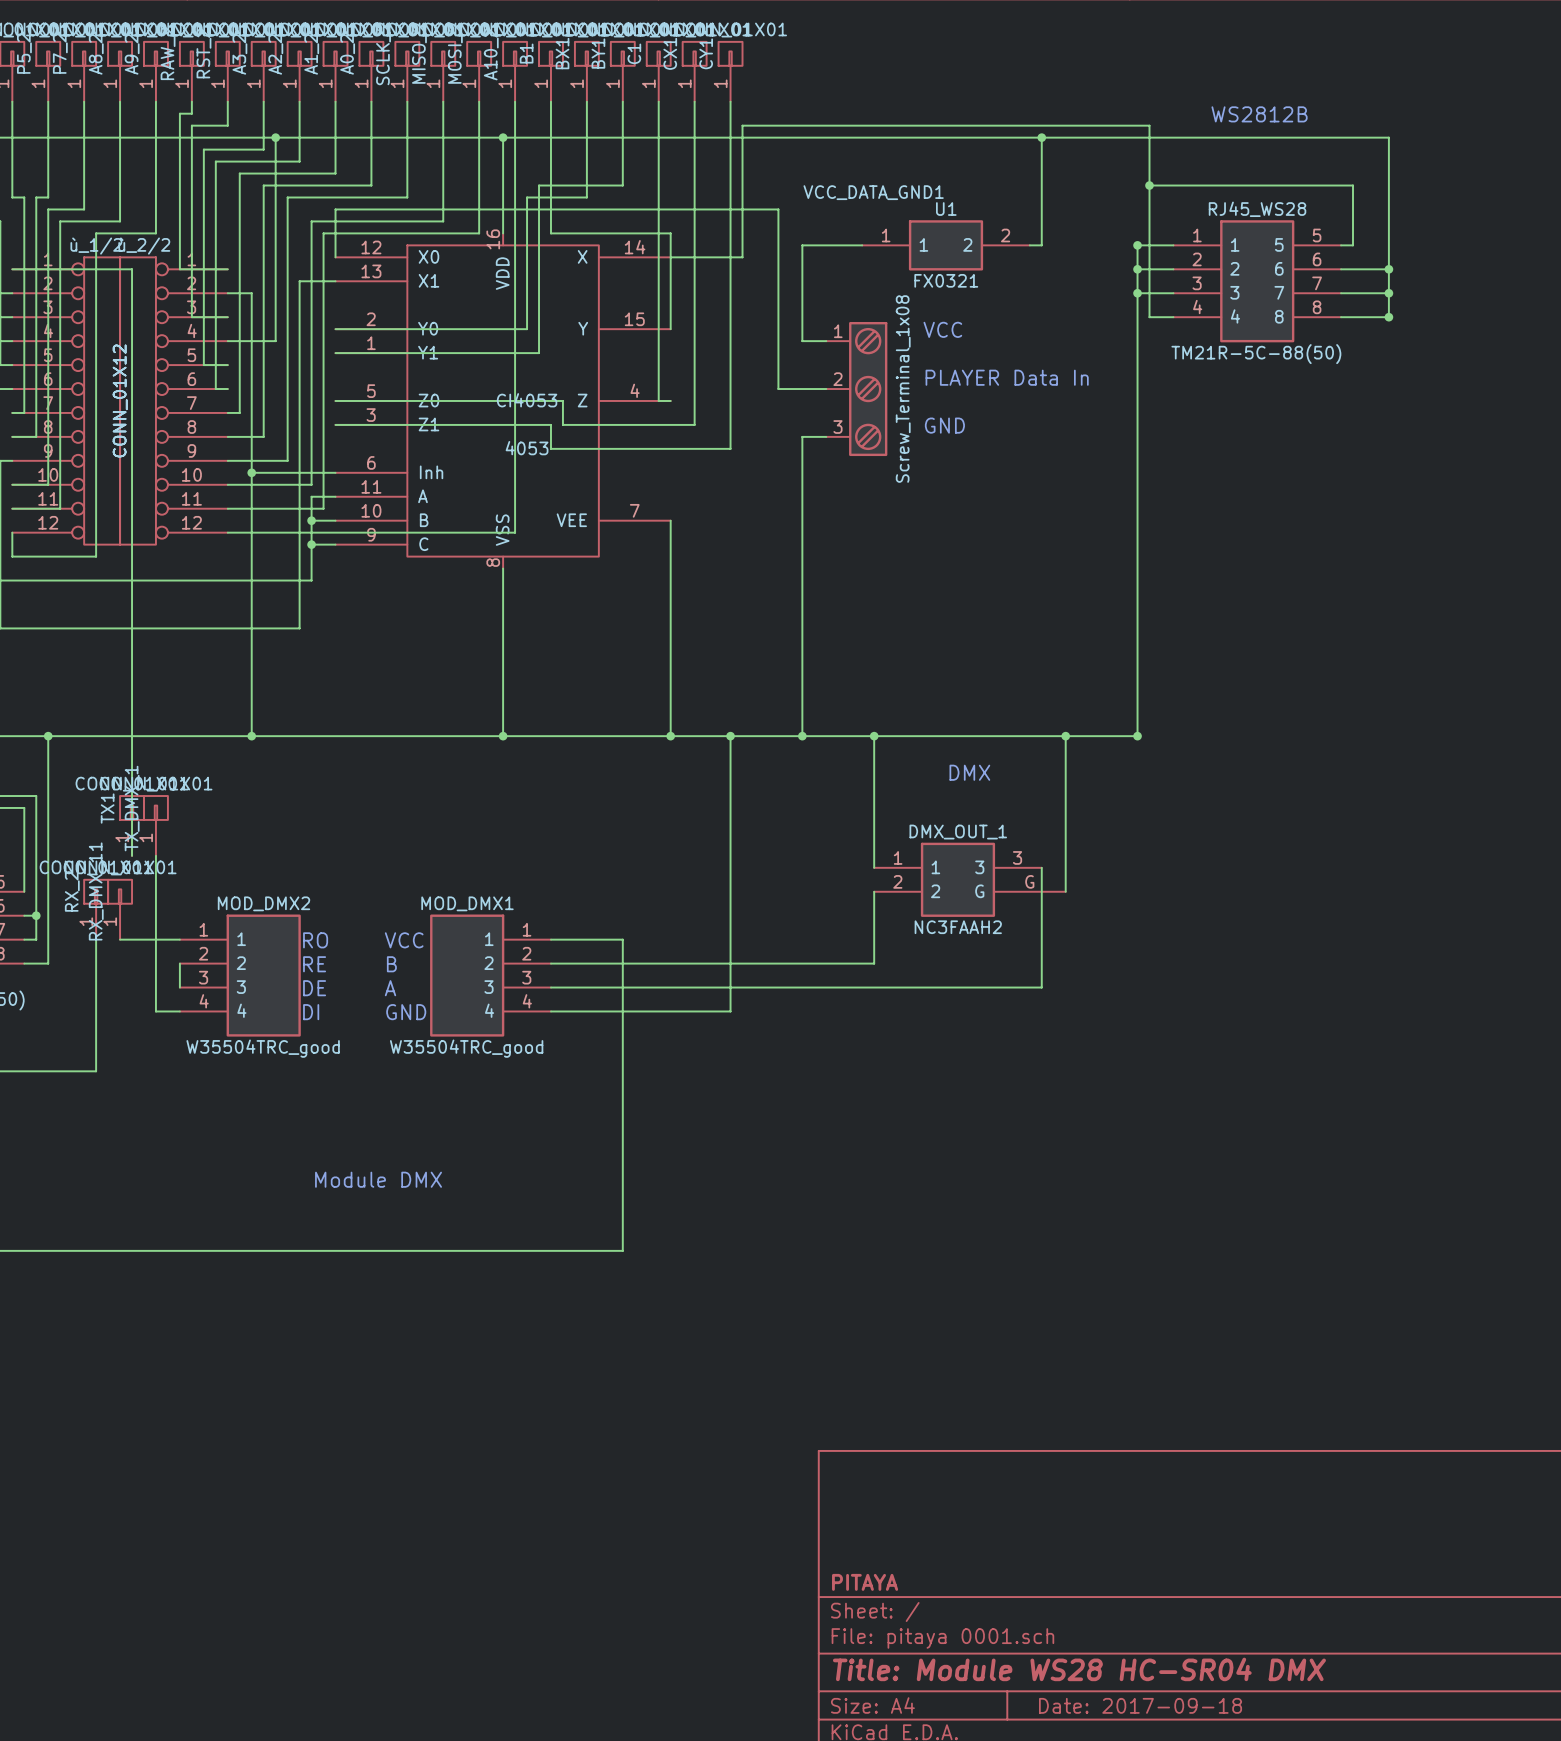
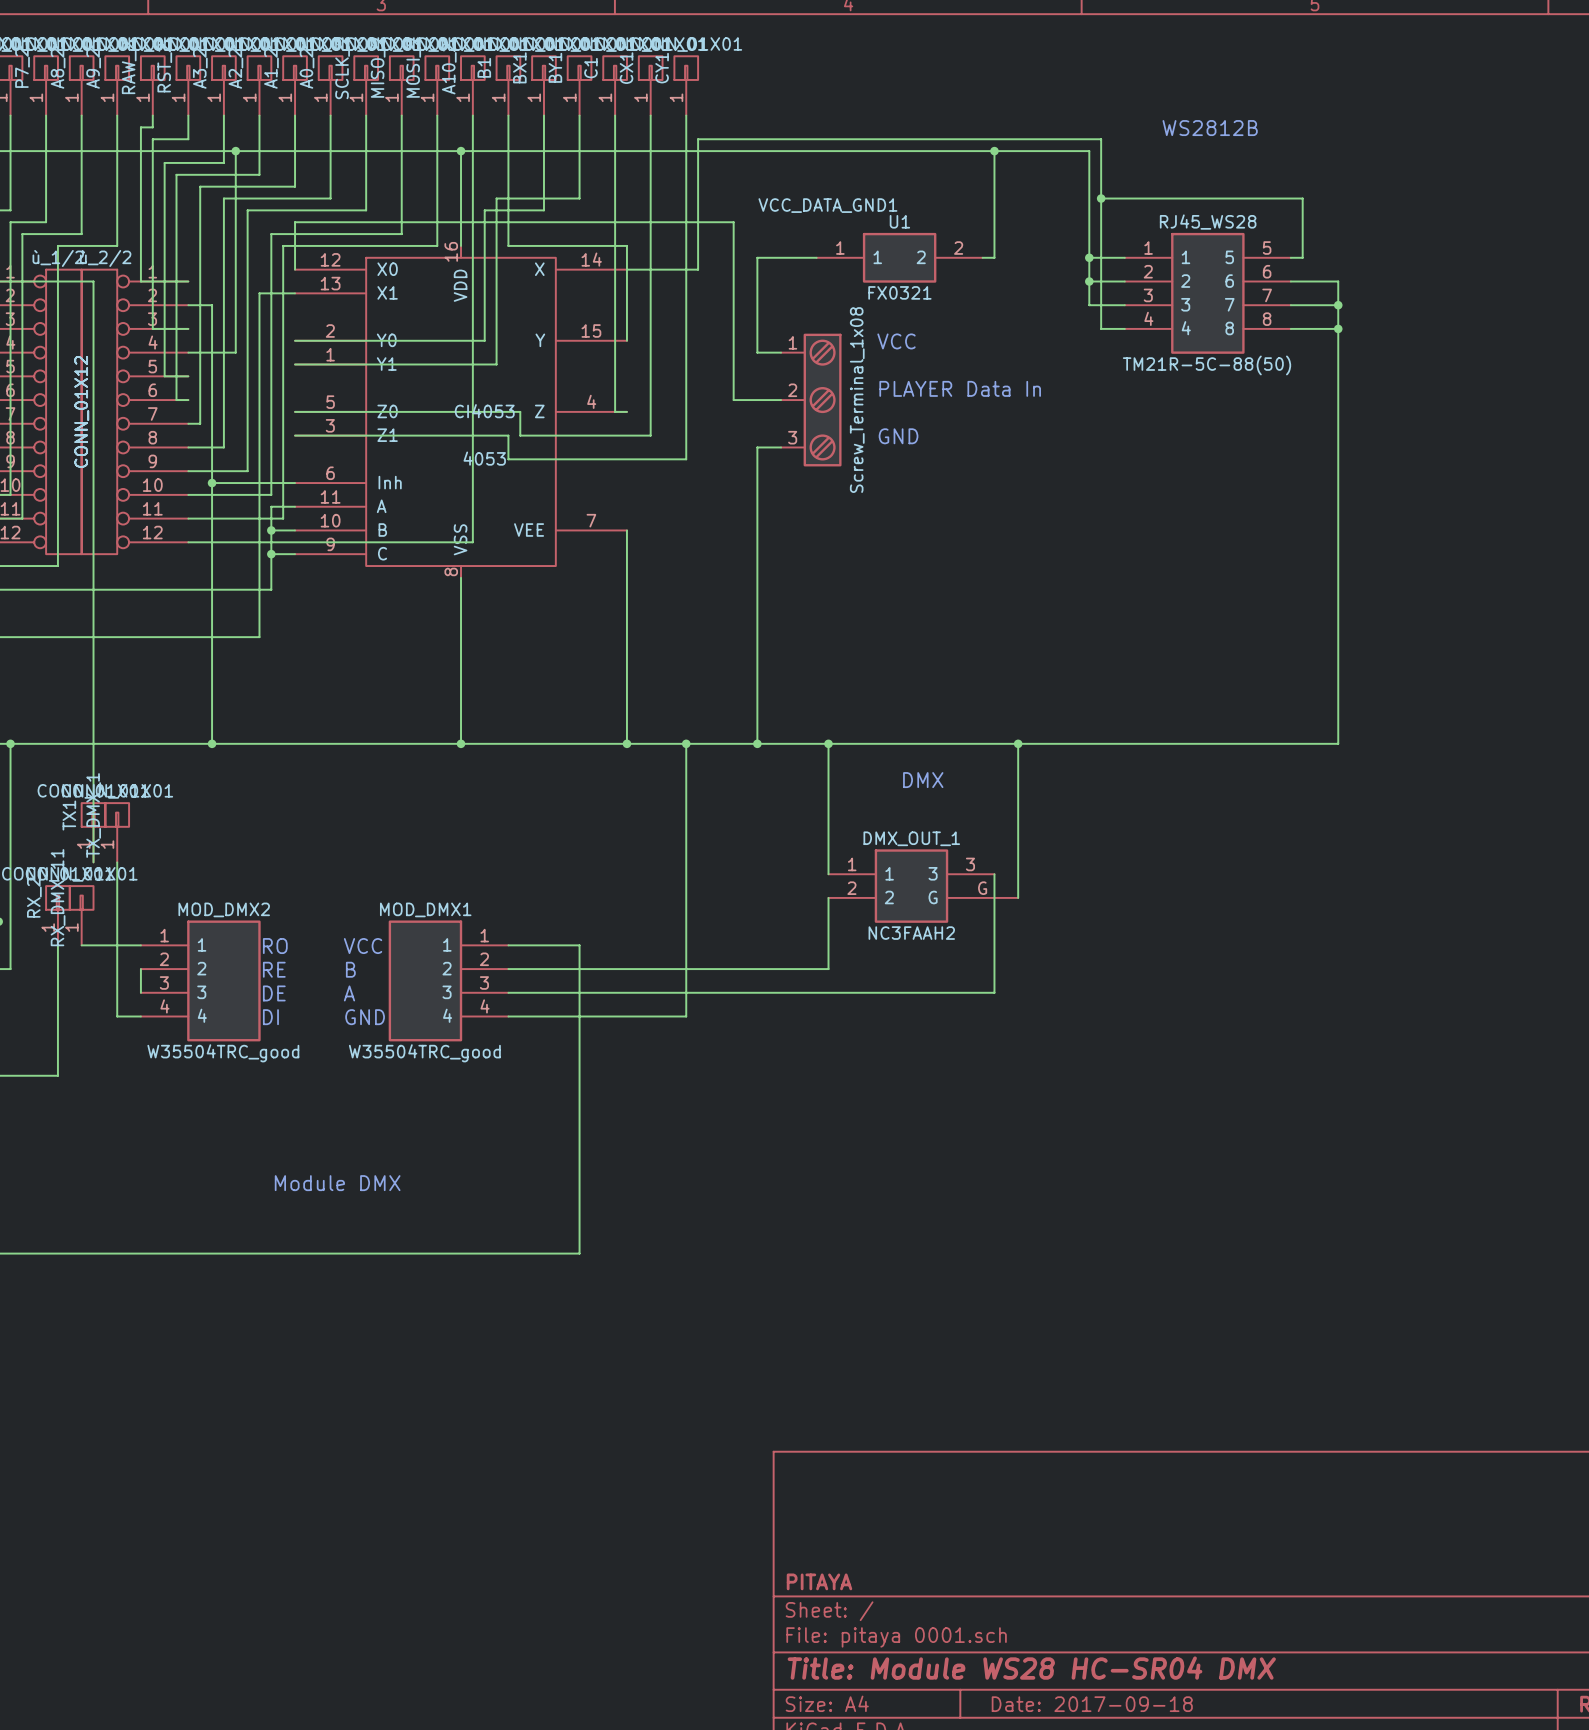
wire: (1137, 137) (1388, 137) (1388, 269) -> (1089, 151) (1089, 257)
junction: (1388, 269) -> none
wire: (1137, 293) (1137, 736) -> (1338, 328) (1338, 743) (1089, 743)
junction: (1137, 293) -> none
junction: (1137, 736) -> none

